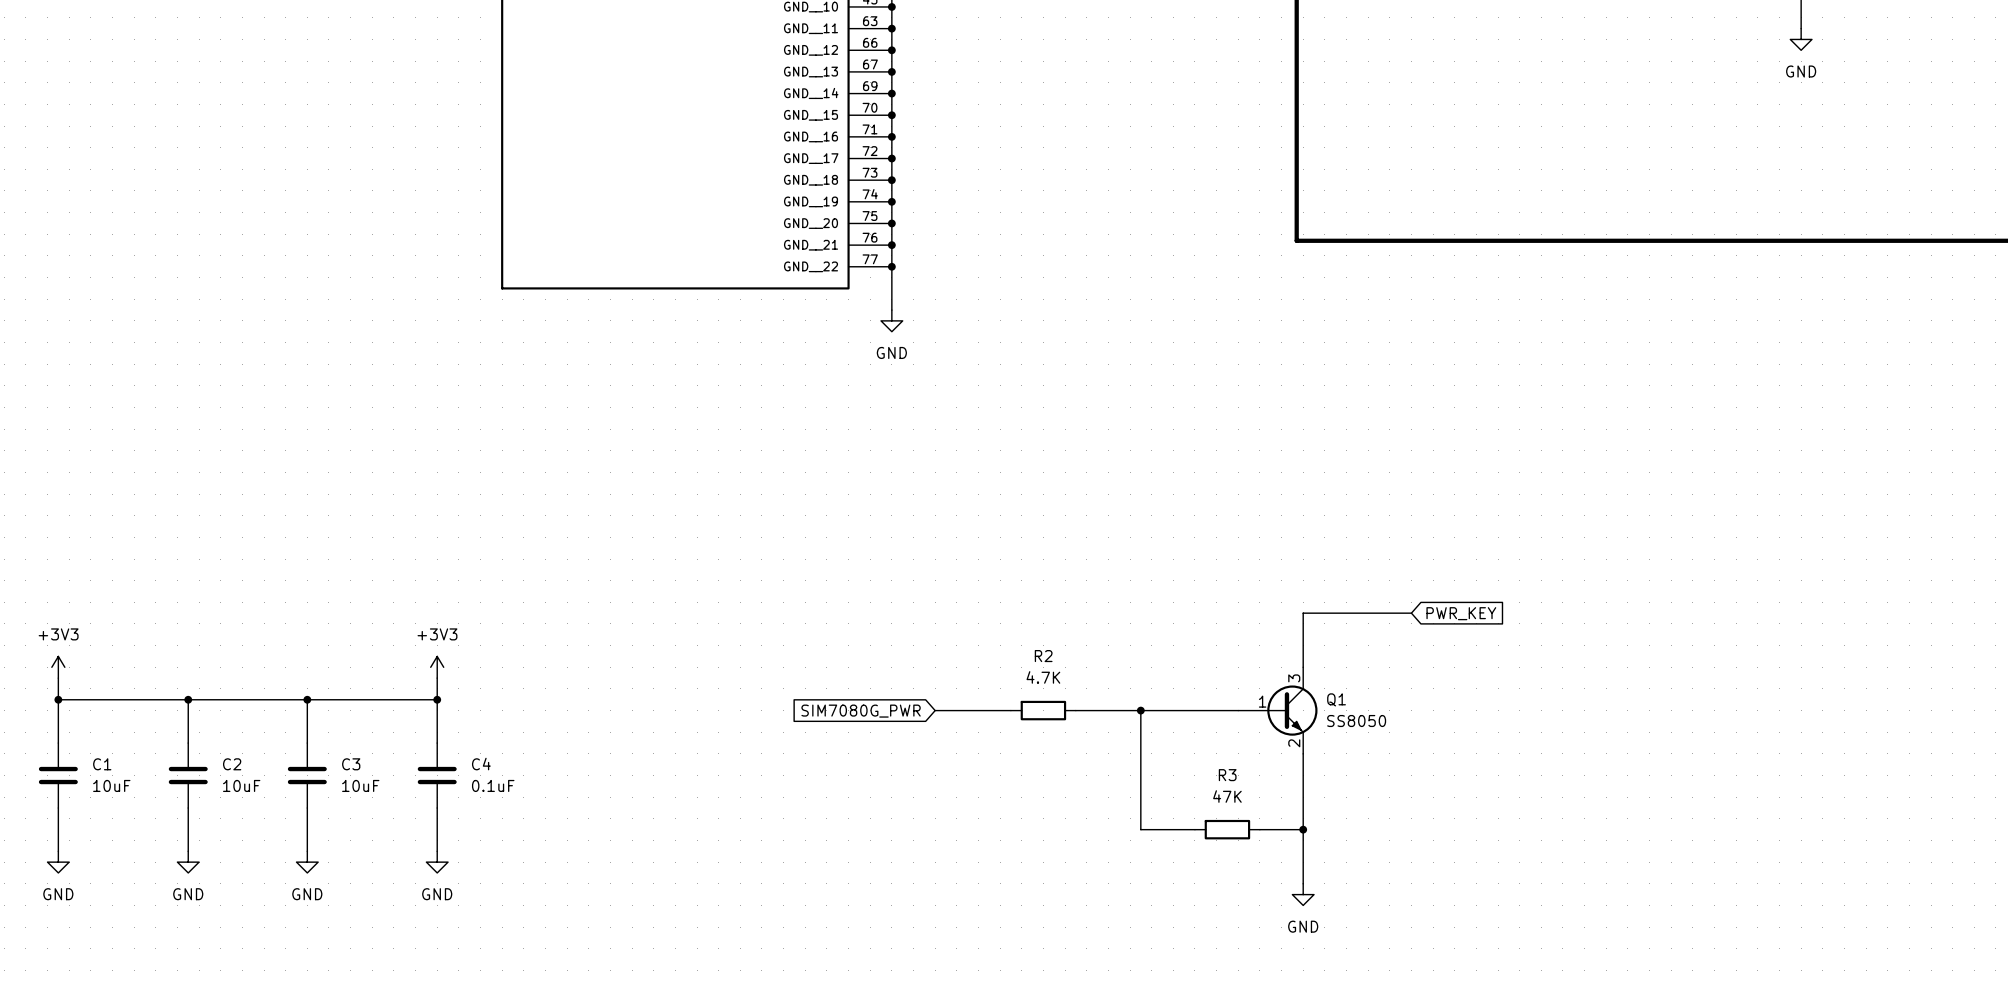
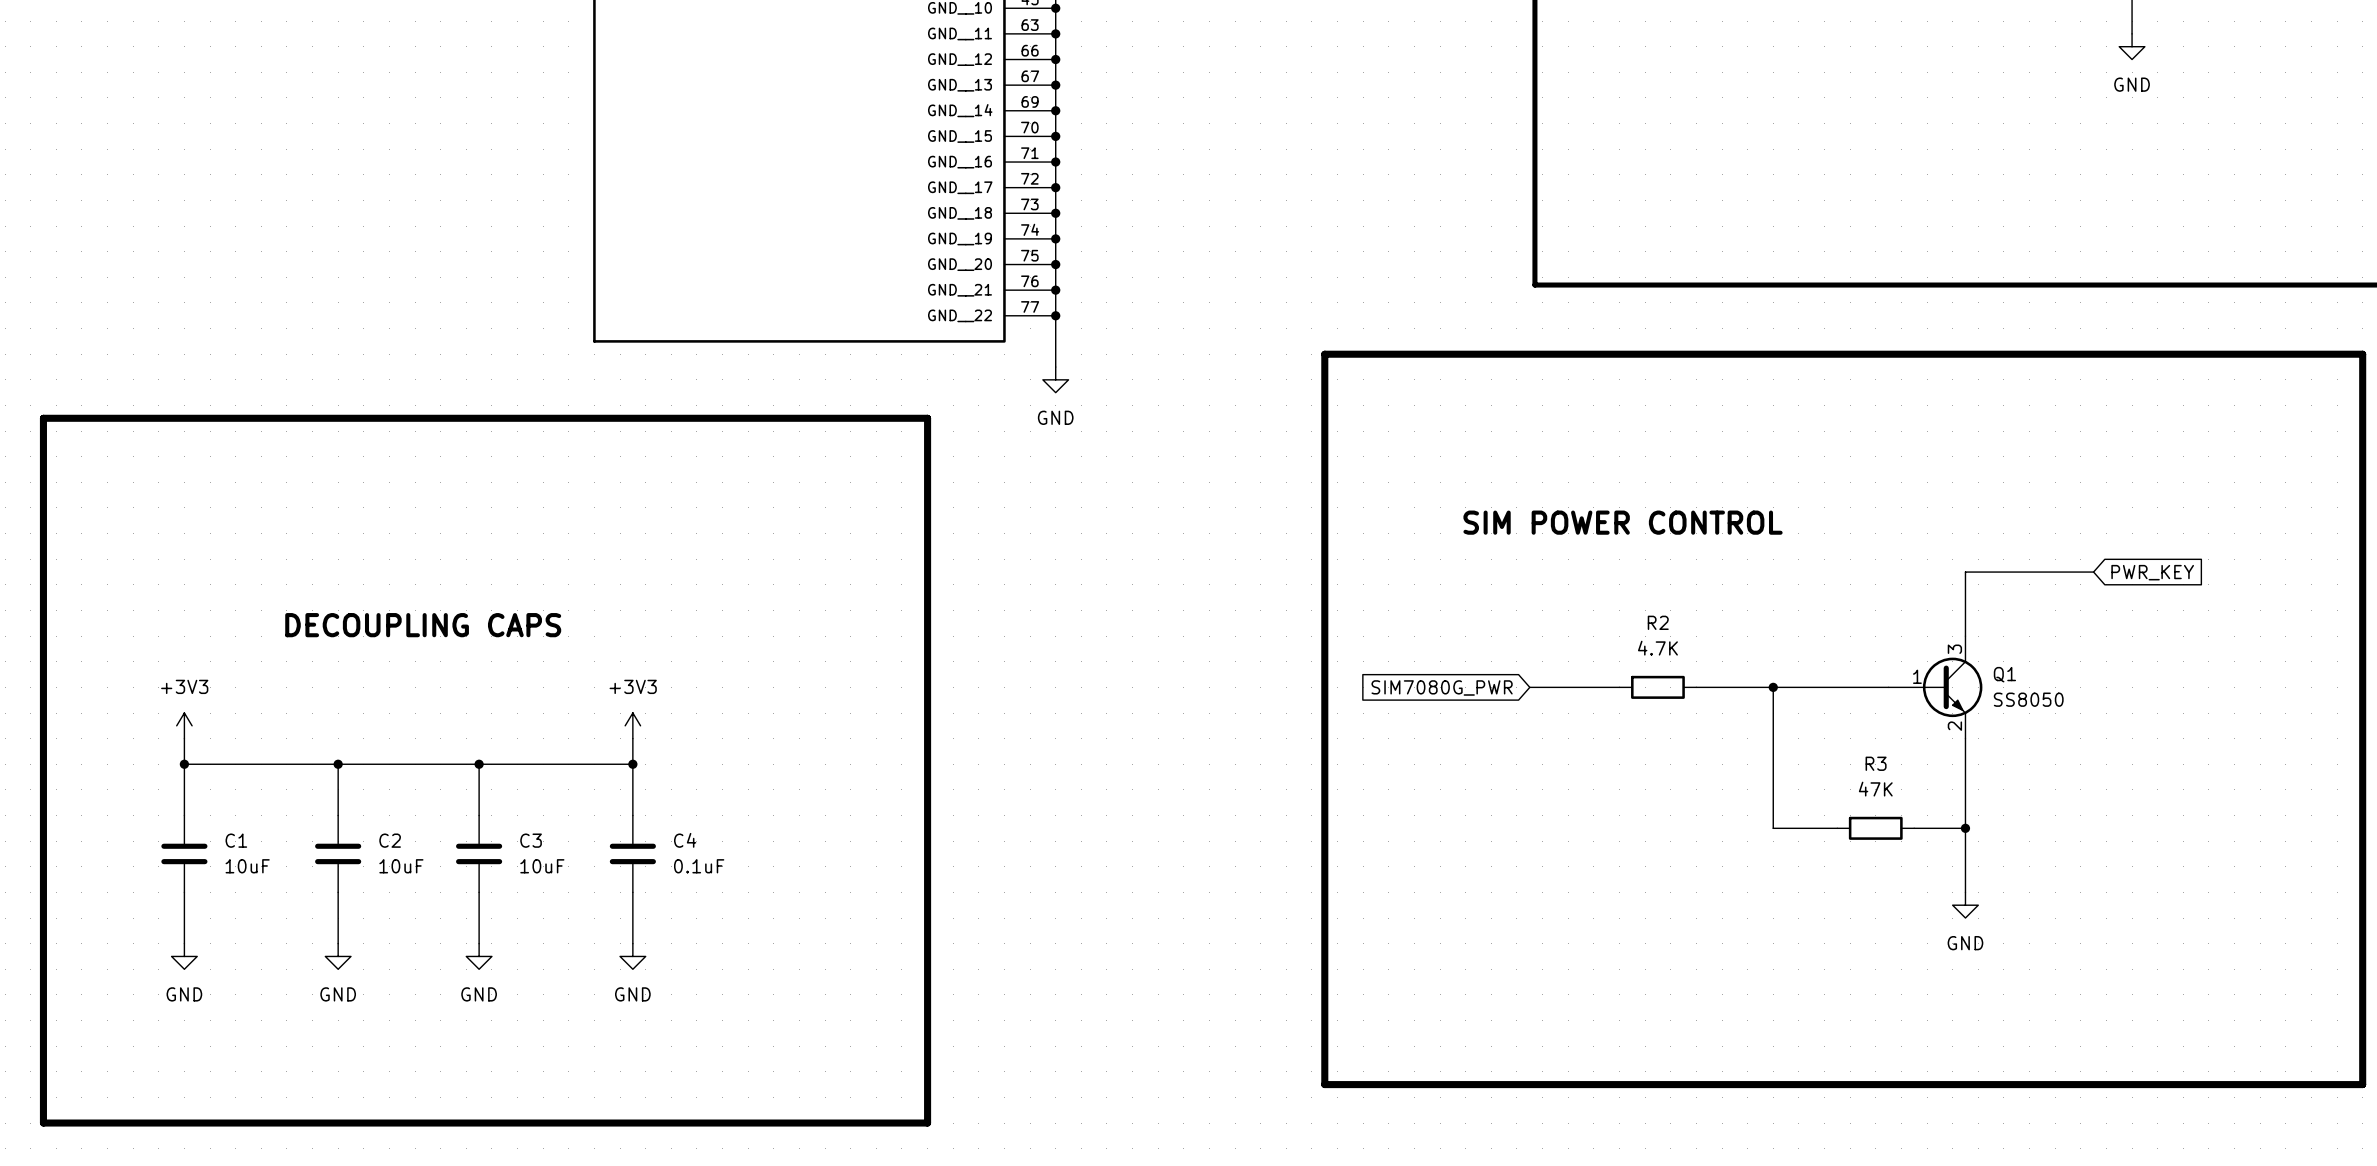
line: none -> (1324, 354) (2362, 354) (2362, 1084) (1324, 1084) (1324, 354)
line: none -> (43, 418) (927, 418) (927, 1123) (43, 1123) (43, 418)
text: none -> SIM POWER CONTROL (1623, 522)
wire: none -> (2093, 572) (1965, 572) (1965, 636)
global label: none -> PWR_KEY (2152, 572)
text: none -> DECOUPLING CAPS (423, 625)
wire: none -> (1529, 687) (1619, 687)
wire: none -> (1696, 687) (1888, 687)
wire: none -> (1773, 687) (1773, 828) (1837, 828)
junction: none -> (1773, 687)
global label: none -> SIM7080G_PWR (1442, 687)
wire: (1411, 613) (1303, 613) (1303, 667) -> none
global label: PWR_KEY (1461, 613) -> none
wire: none -> (1965, 738) (1965, 892)
junction: none -> (184, 764)
junction: none -> (338, 764)
junction: none -> (479, 764)
junction: none -> (632, 764)
power symbol position: +3V3 (58, 667) -> +3V3 (184, 725)
power symbol position: +3V3 (437, 667) -> +3V3 (632, 725)
wire: (58, 678) (58, 743) -> (184, 738) (184, 815)
wire: (437, 678) (437, 743) -> (632, 738) (632, 815)
wire: (58, 699) (437, 699) -> (184, 764) (632, 764)
junction: (58, 699) -> none
wire: (188, 699) (188, 743) -> (338, 764) (338, 815)
junction: (188, 699) -> none
wire: (307, 699) (307, 743) -> (479, 764) (479, 815)
junction: (307, 699) -> none
junction: (437, 699) -> none
wire: none -> (1914, 828) (1965, 828)
junction: none -> (1965, 828)
wire: (935, 710) (1010, 710) -> none
R2 position: (1043, 710) -> (1657, 687)
wire: (1075, 710) (1238, 710) -> none
wire: (1140, 710) (1140, 829) (1194, 829) -> none
junction: (1140, 710) -> none
Q1 position: (1277, 710) -> (1935, 687)
global label: SIM7080G_PWR (861, 711) -> none
wire: (1303, 753) (1303, 883) -> none
power symbol: none -> GND (1965, 905)
C1 position: (58, 775) -> (184, 853)
C2 position: (188, 775) -> (338, 853)
C3 position: (307, 775) -> (479, 853)
C4 position: (437, 775) -> (632, 853)
wire: (58, 808) (58, 851) -> (184, 892) (184, 943)
power symbol: none -> GND (184, 956)
wire: (188, 808) (188, 851) -> (338, 892) (338, 943)
power symbol: none -> GND (338, 956)
wire: (307, 808) (307, 851) -> (479, 892) (479, 943)
power symbol: none -> GND (479, 956)
wire: (437, 808) (437, 851) -> (632, 892) (632, 943)
power symbol: none -> GND (632, 956)
R3 position: (1227, 829) -> (1875, 828)
wire: (1259, 829) (1303, 829) -> none
junction: (1303, 829) -> none
power symbol: GND (58, 862) -> none
power symbol: GND (188, 862) -> none
power symbol: GND (307, 862) -> none
power symbol: GND (437, 862) -> none
power symbol: GND (1303, 894) -> none

